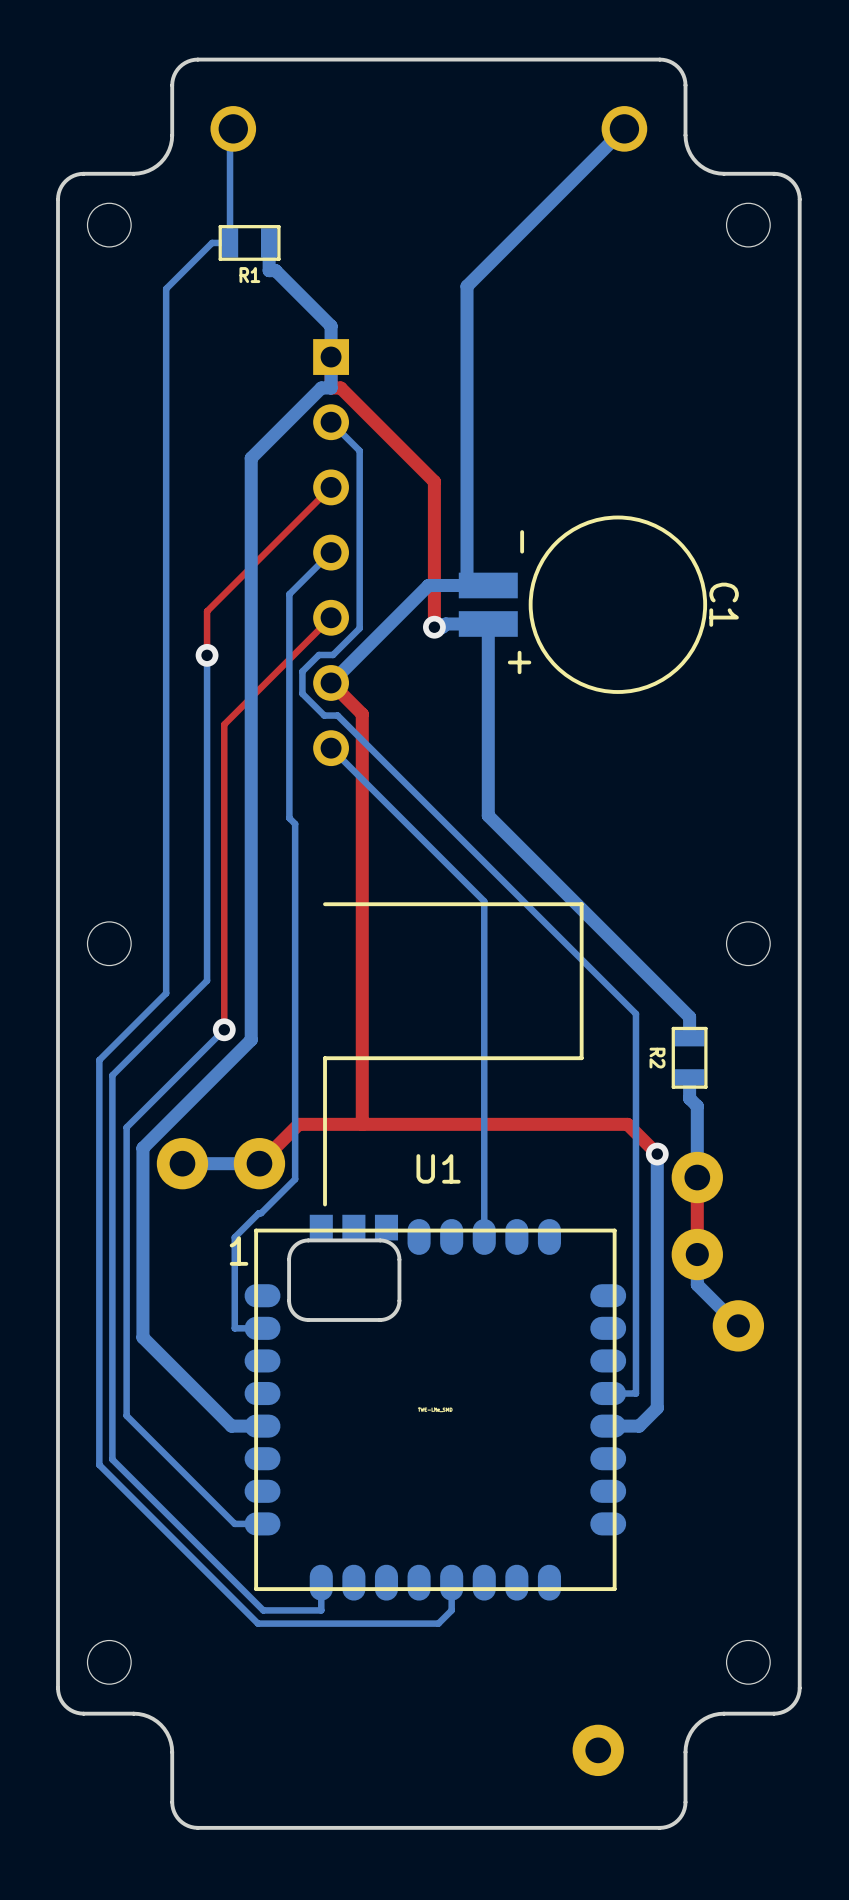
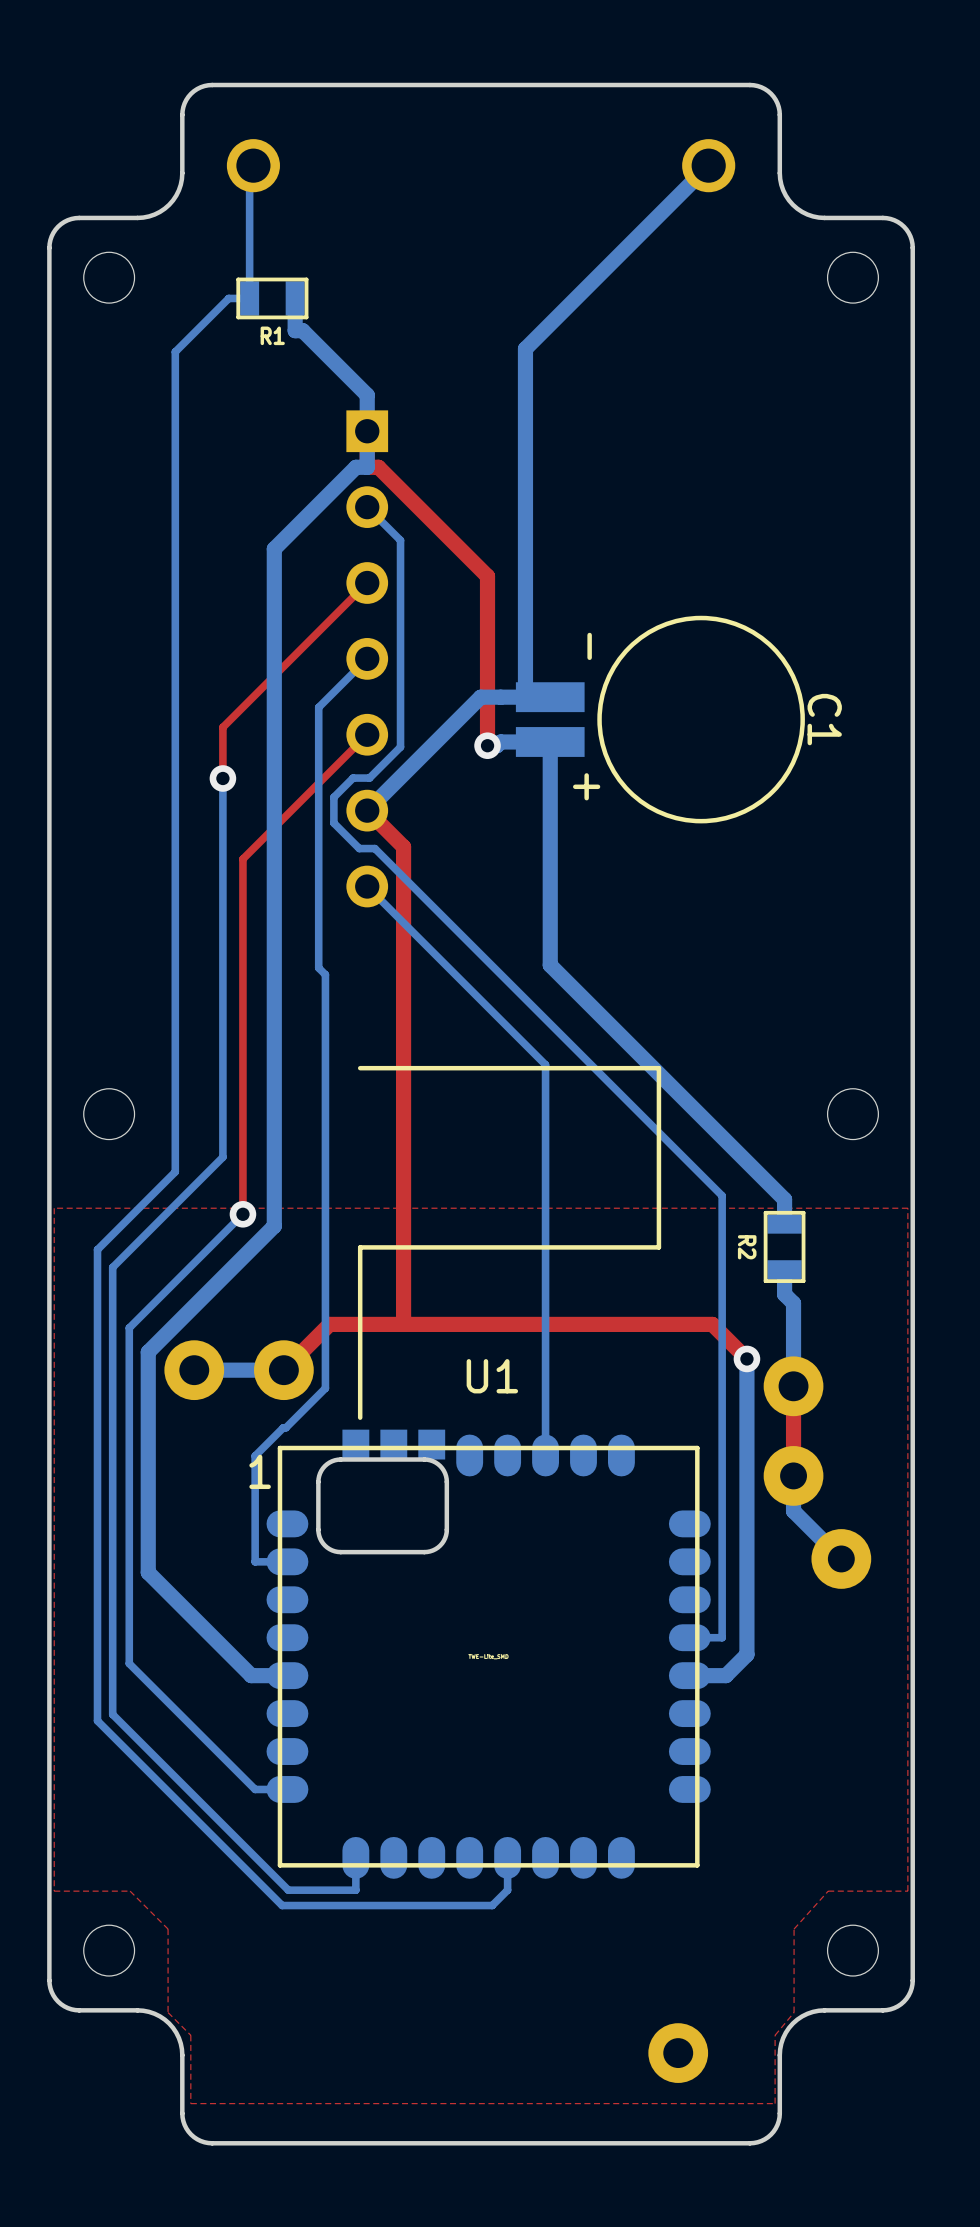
top zone outline: none -> (907, 1208) (907, 1891) (828, 1891) (794, 1929) (794, 2012) (775, 2035) (775, 2103) (190, 2103) (190, 2035) (168, 2012) (168, 1929) (130, 1891) (54, 1891) (54, 1208) (907, 1208)

